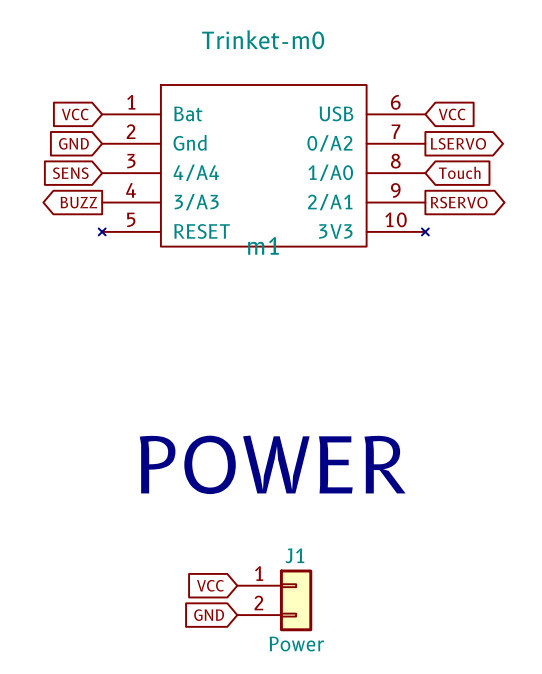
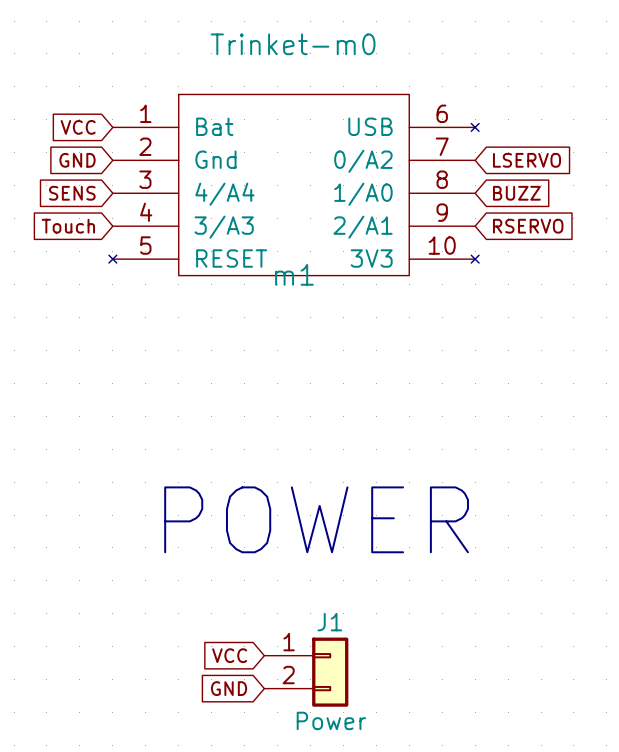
m1 symbol: [98, 85, 429, 247] -> [108, 94, 480, 276]
global label: VCC (452, 114) -> none
global label shape: output (458, 143) -> input (526, 160)
global label: Touch (459, 172) -> BUZZ (516, 193)
global label shape: output (78, 202) -> input (68, 226)
global label: BUZZ (78, 202) -> Touch (68, 226)
global label shape: output (459, 202) -> input (528, 226)

